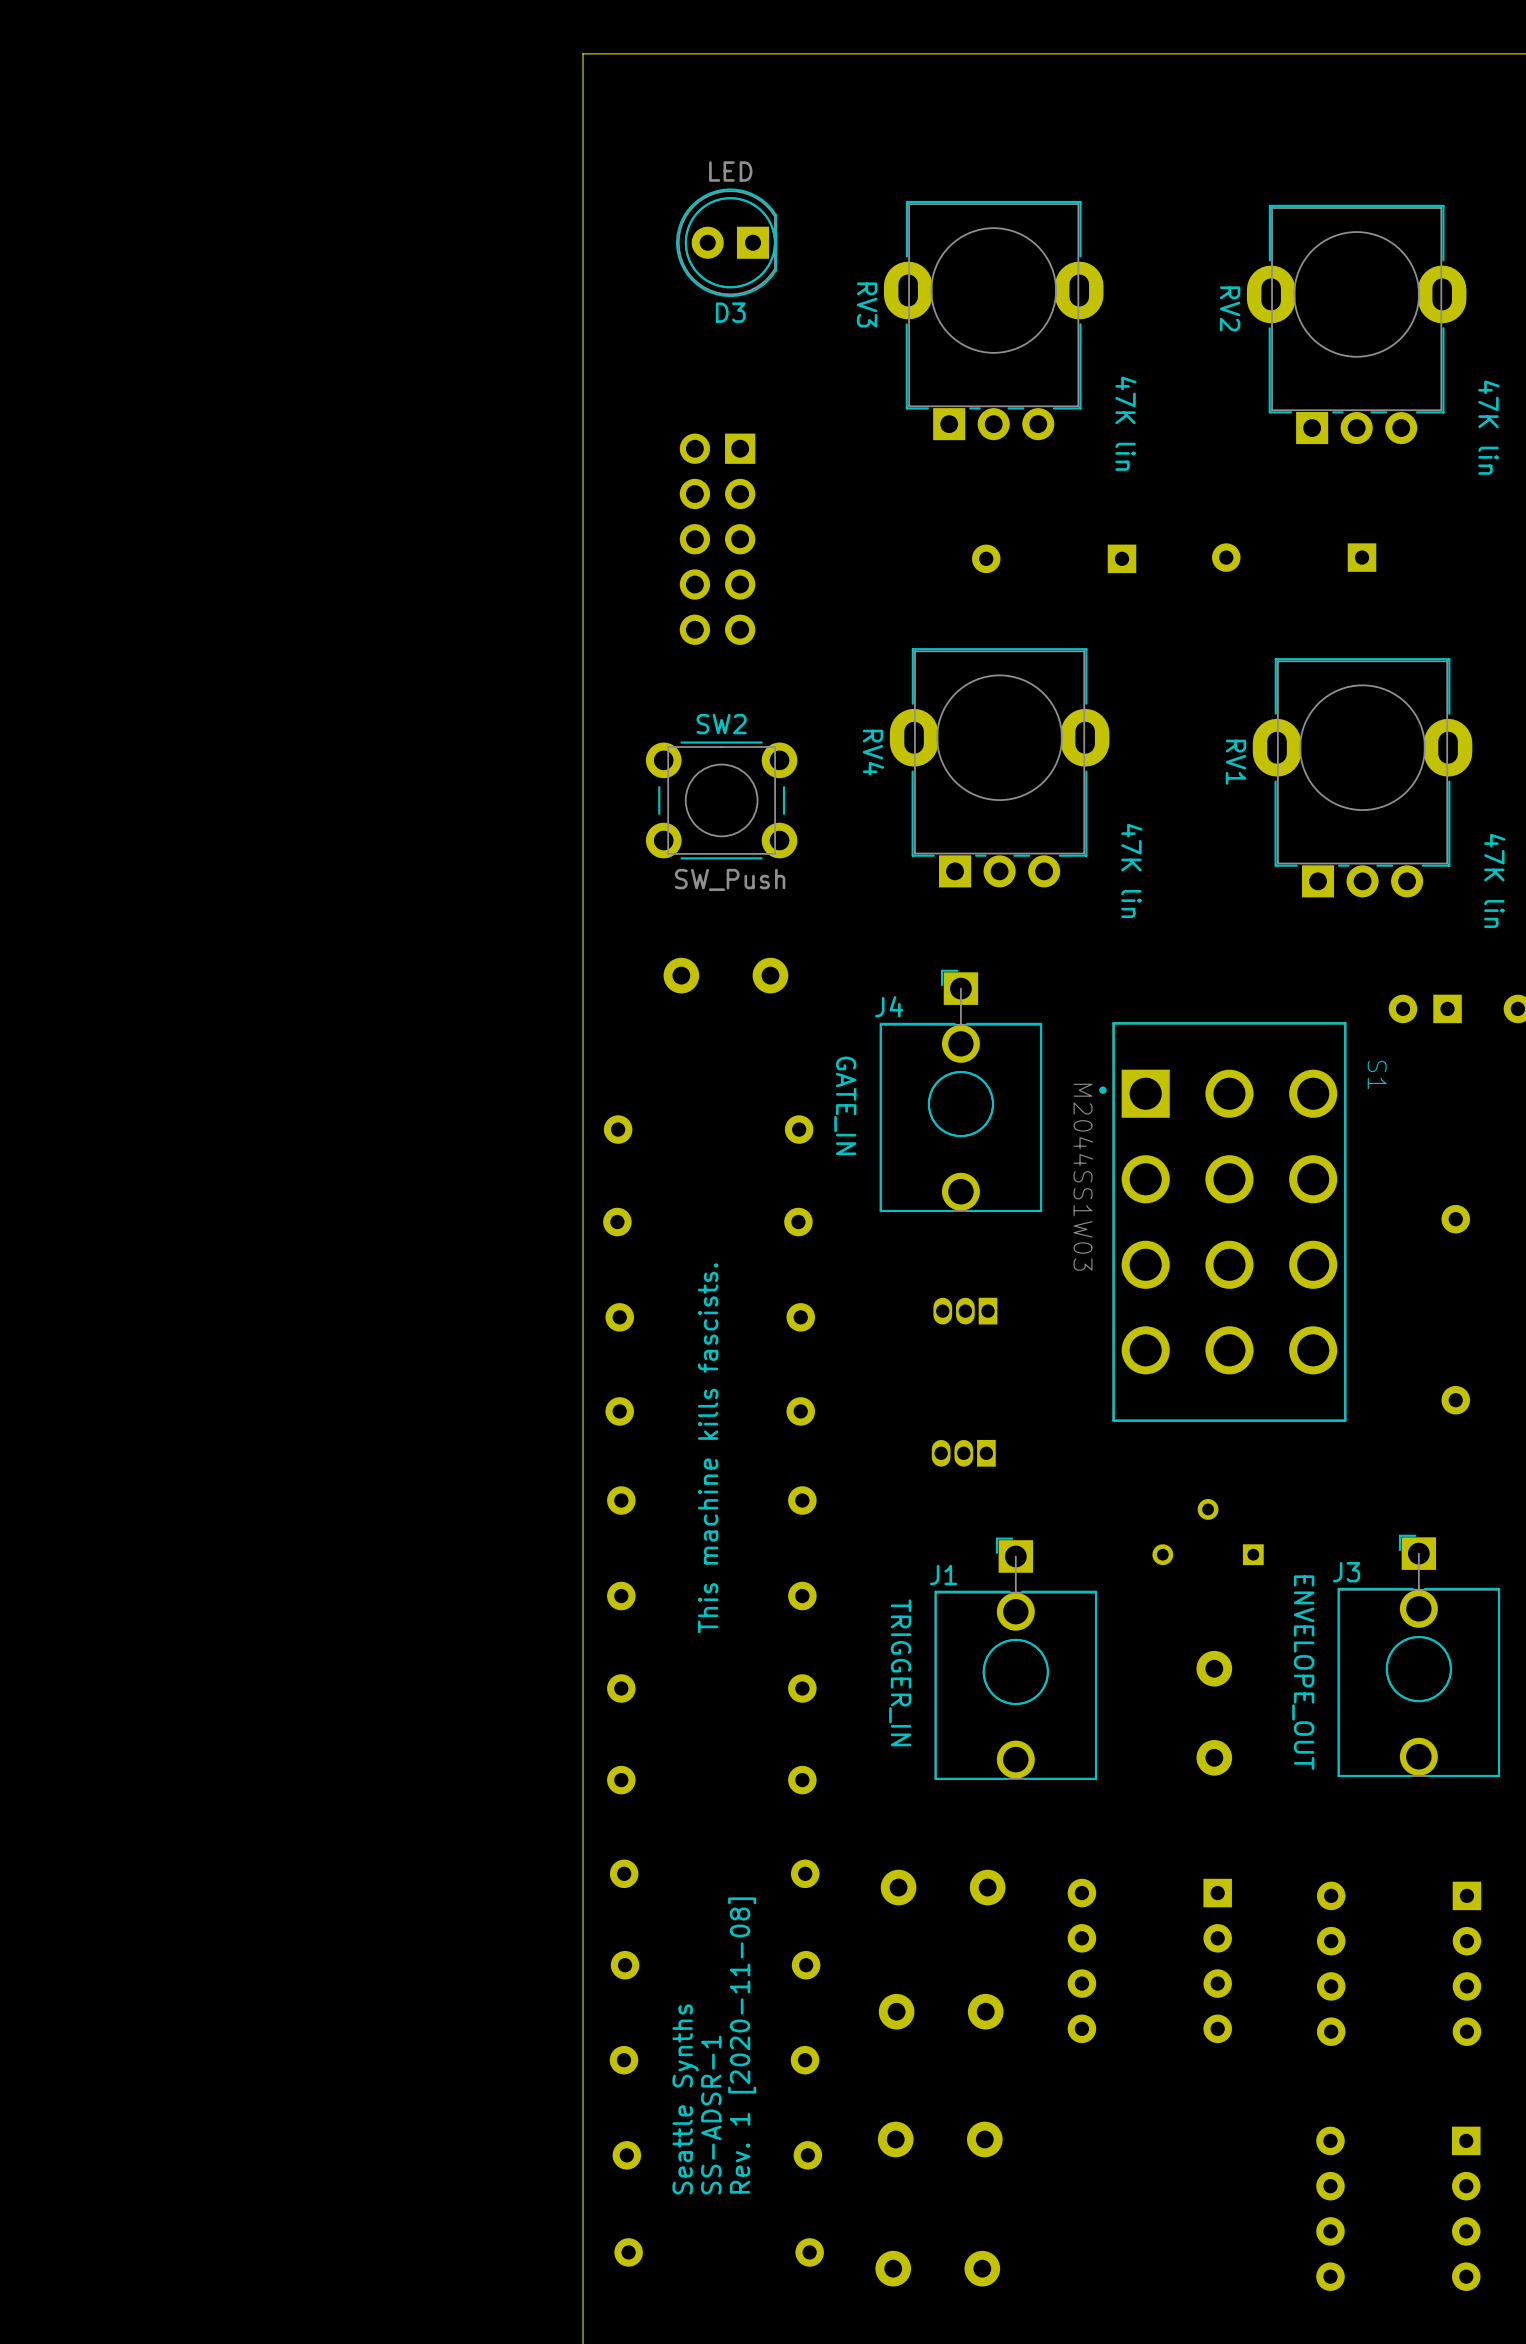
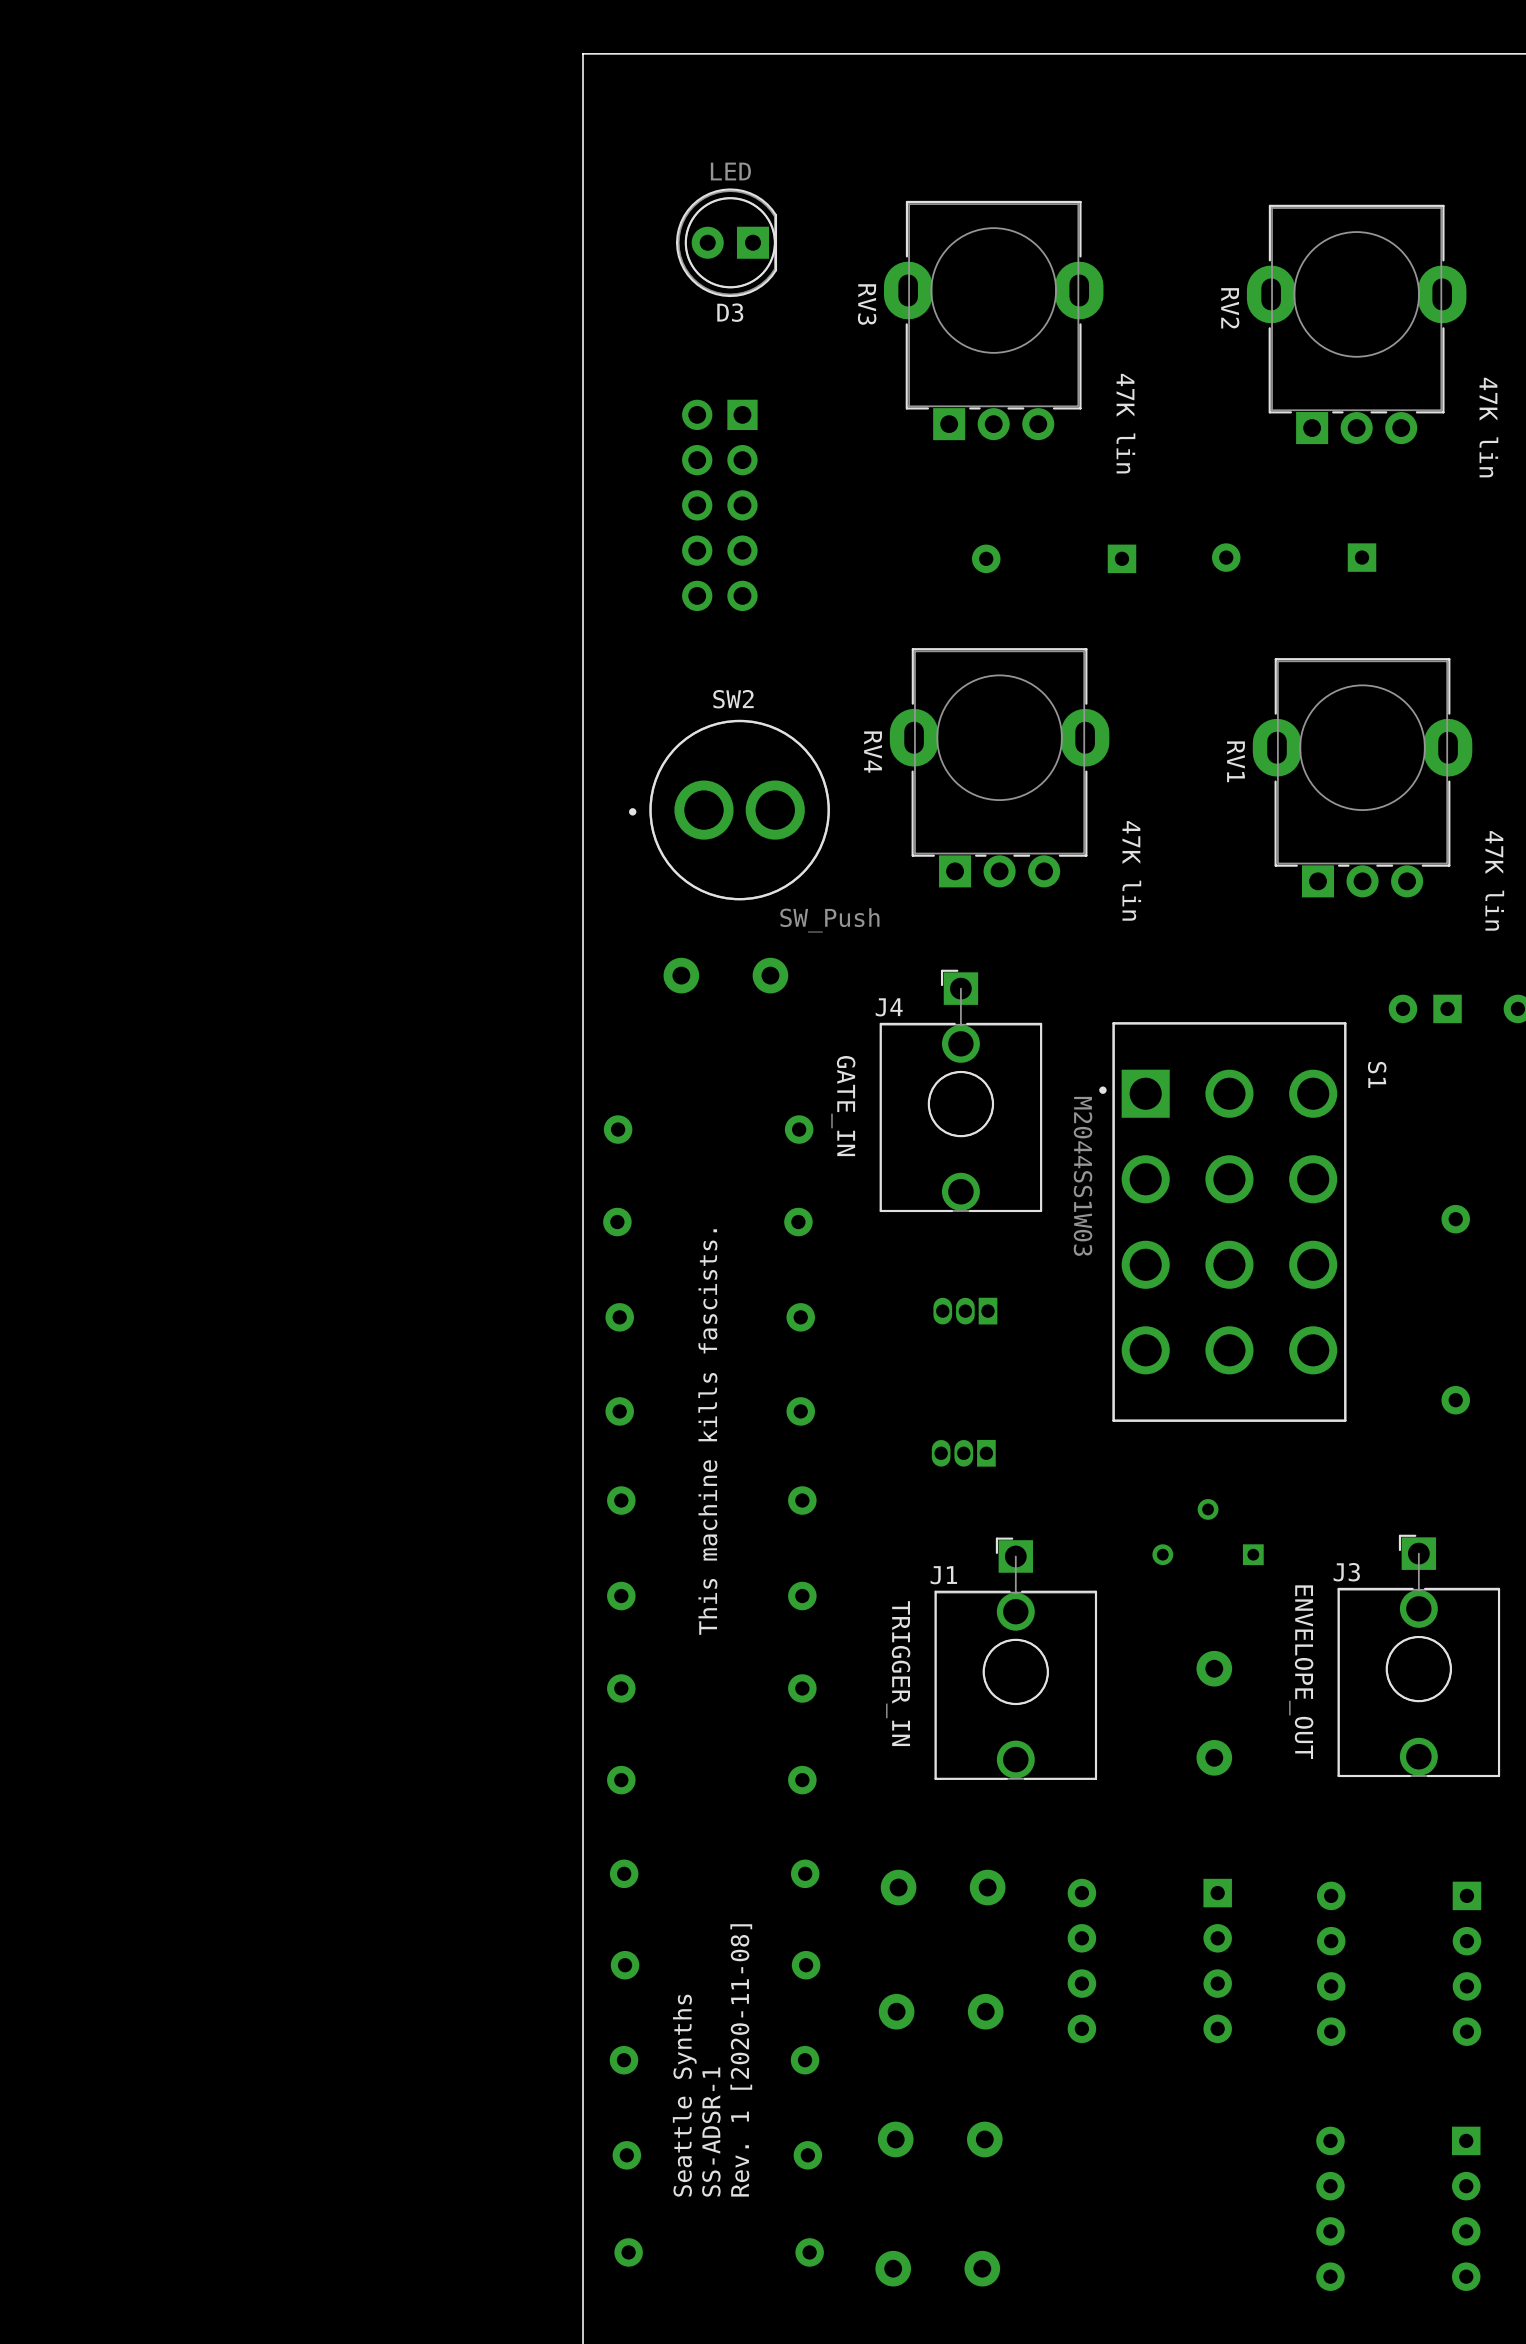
part position: (717, 539) -> (719, 505)
SW2 footprint: [645, 741, 798, 860] -> [629, 719, 830, 901]
SW2 value position: SW_Push (730, 879) -> SW_Push (829, 920)

